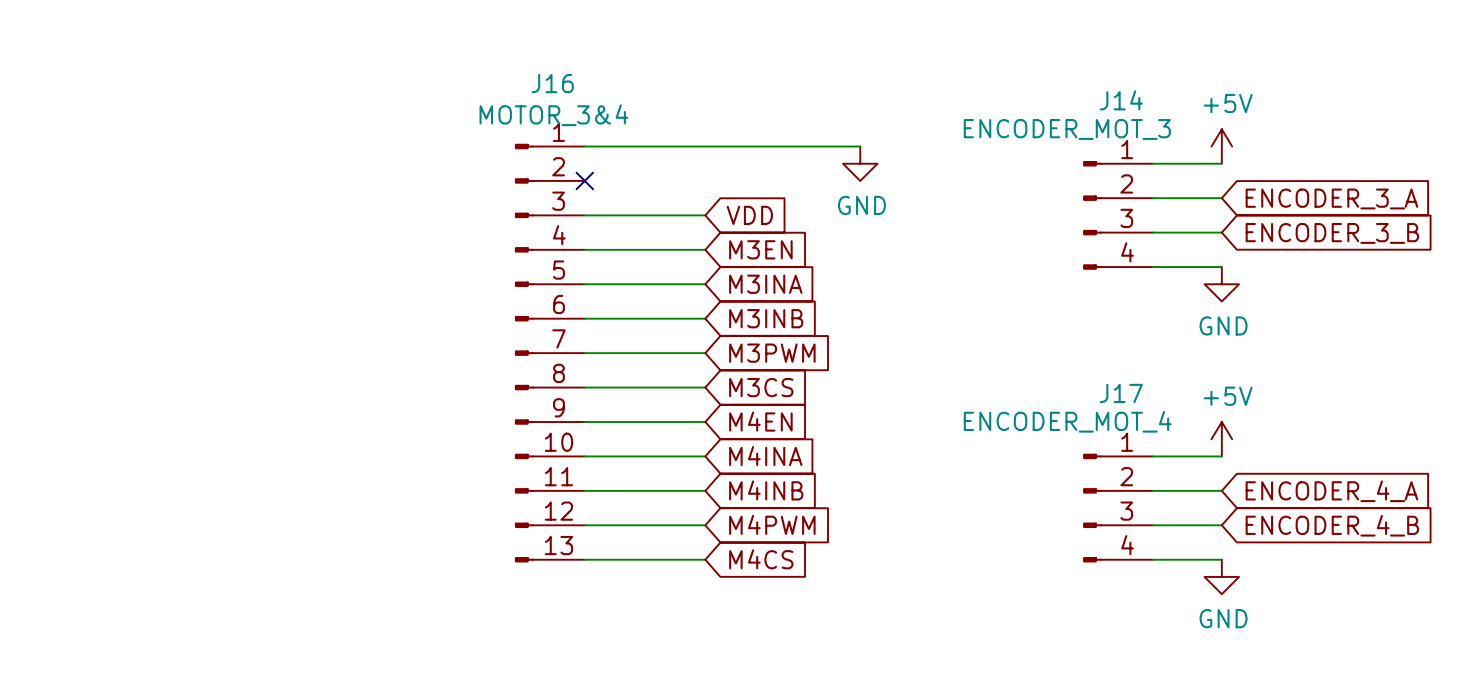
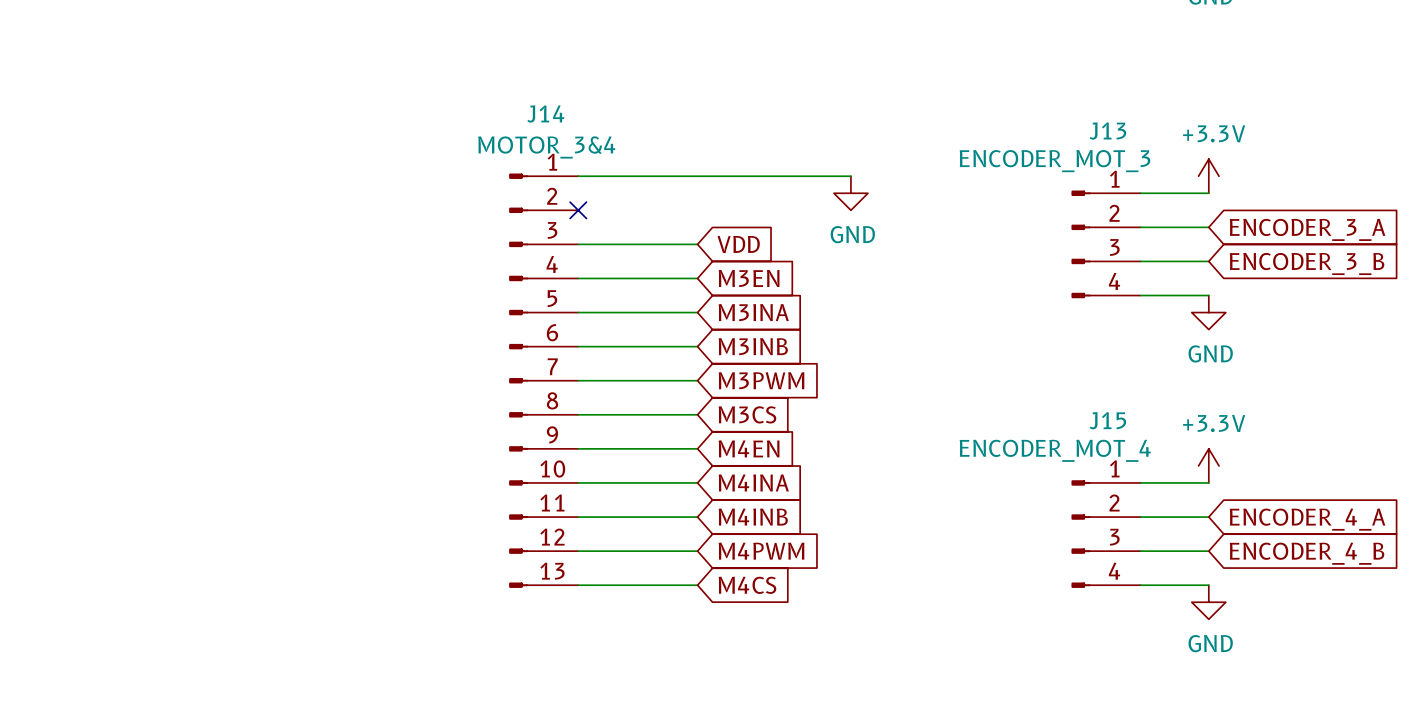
J16 name: J16 (552, 83) -> J14 (545, 114)
J14 name: J14 (1121, 100) -> J13 (1107, 131)
power symbol: +5V (1221, 146) -> +3.3V (1208, 176)
J17 name: J17 (1121, 393) -> J15 (1107, 420)
power symbol: +5V (1221, 439) -> +3.3V (1208, 465)

